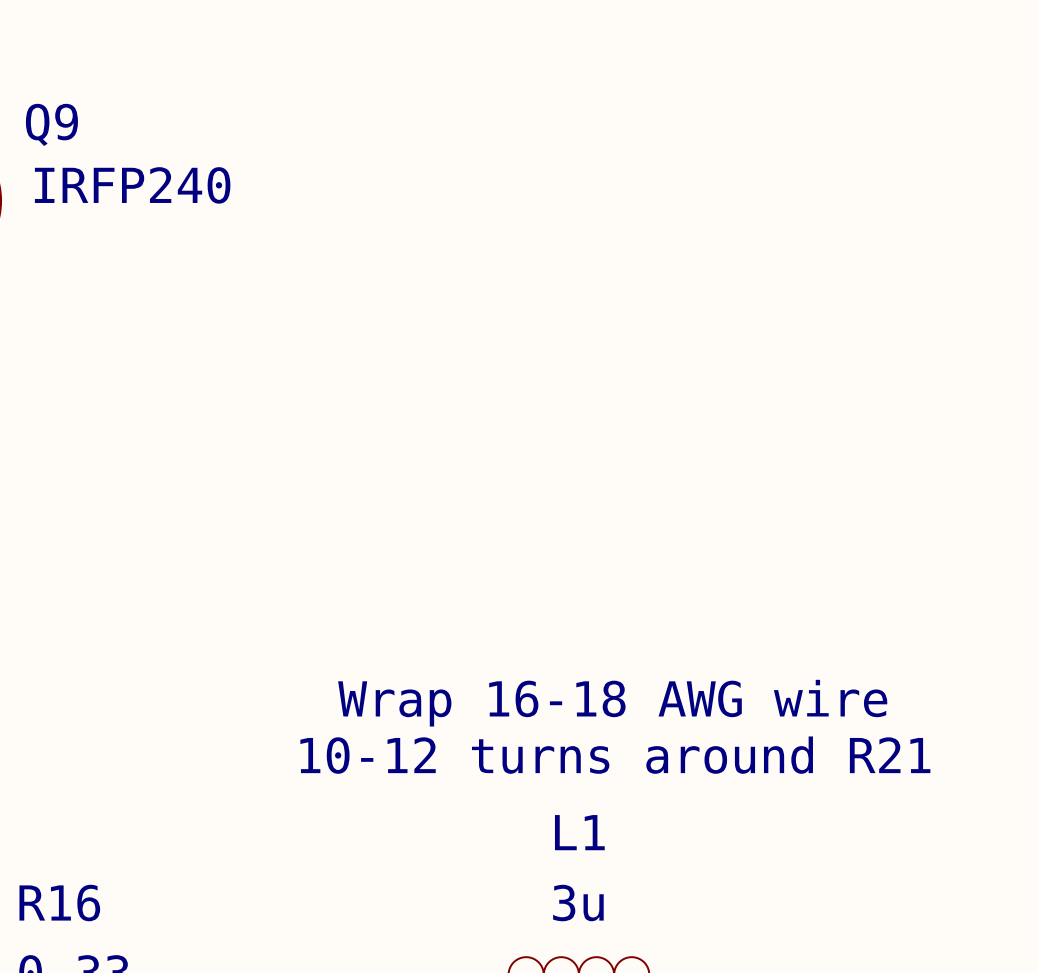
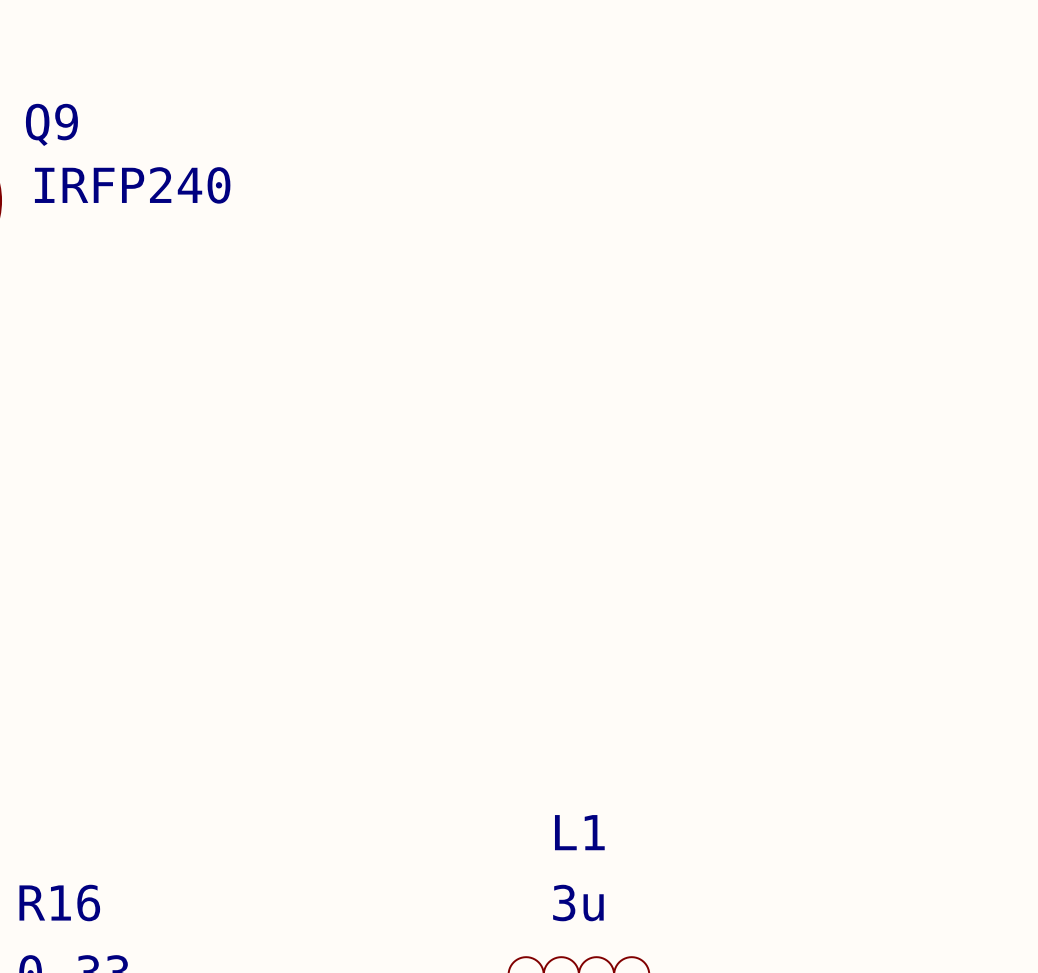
text: Wrap 16-18 AWG wire (612, 703) -> none
text: 10-12 turns around R21 (615, 755) -> none

